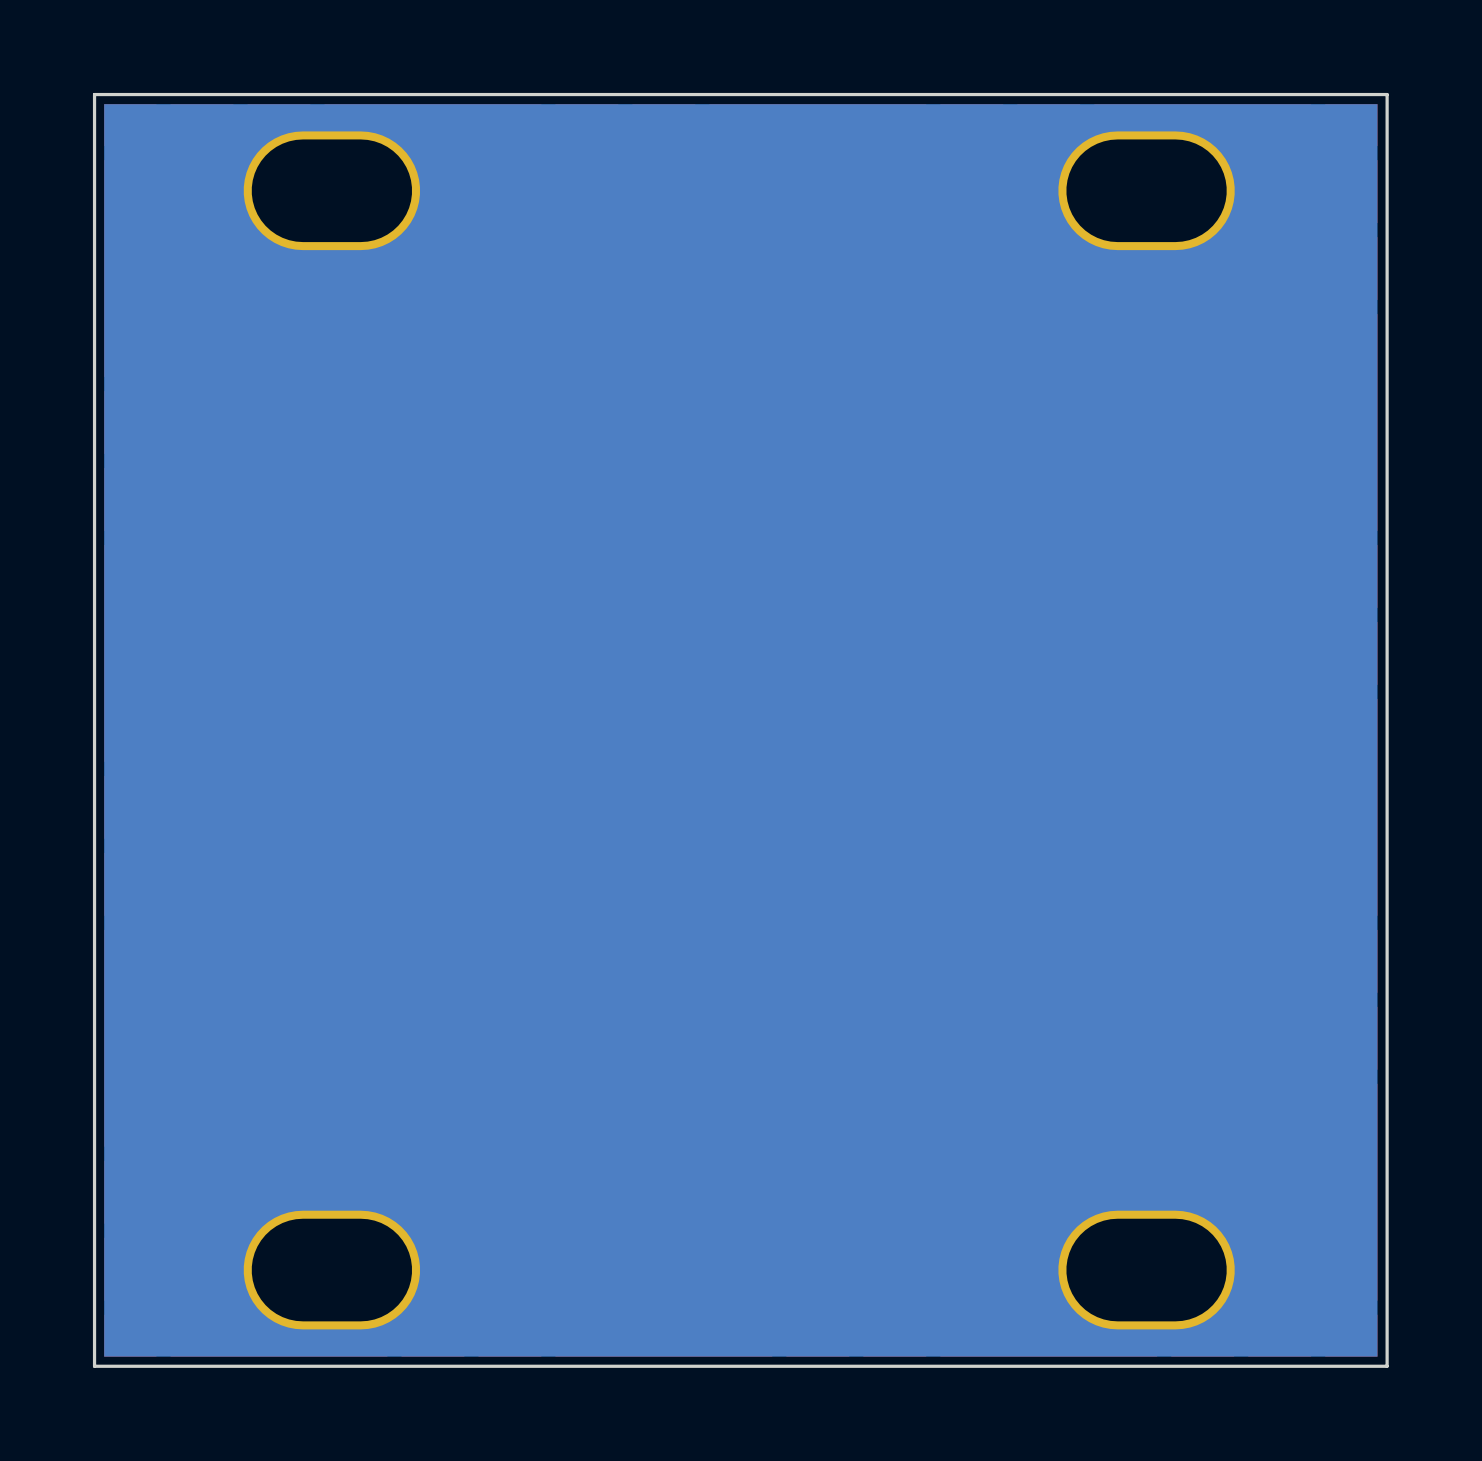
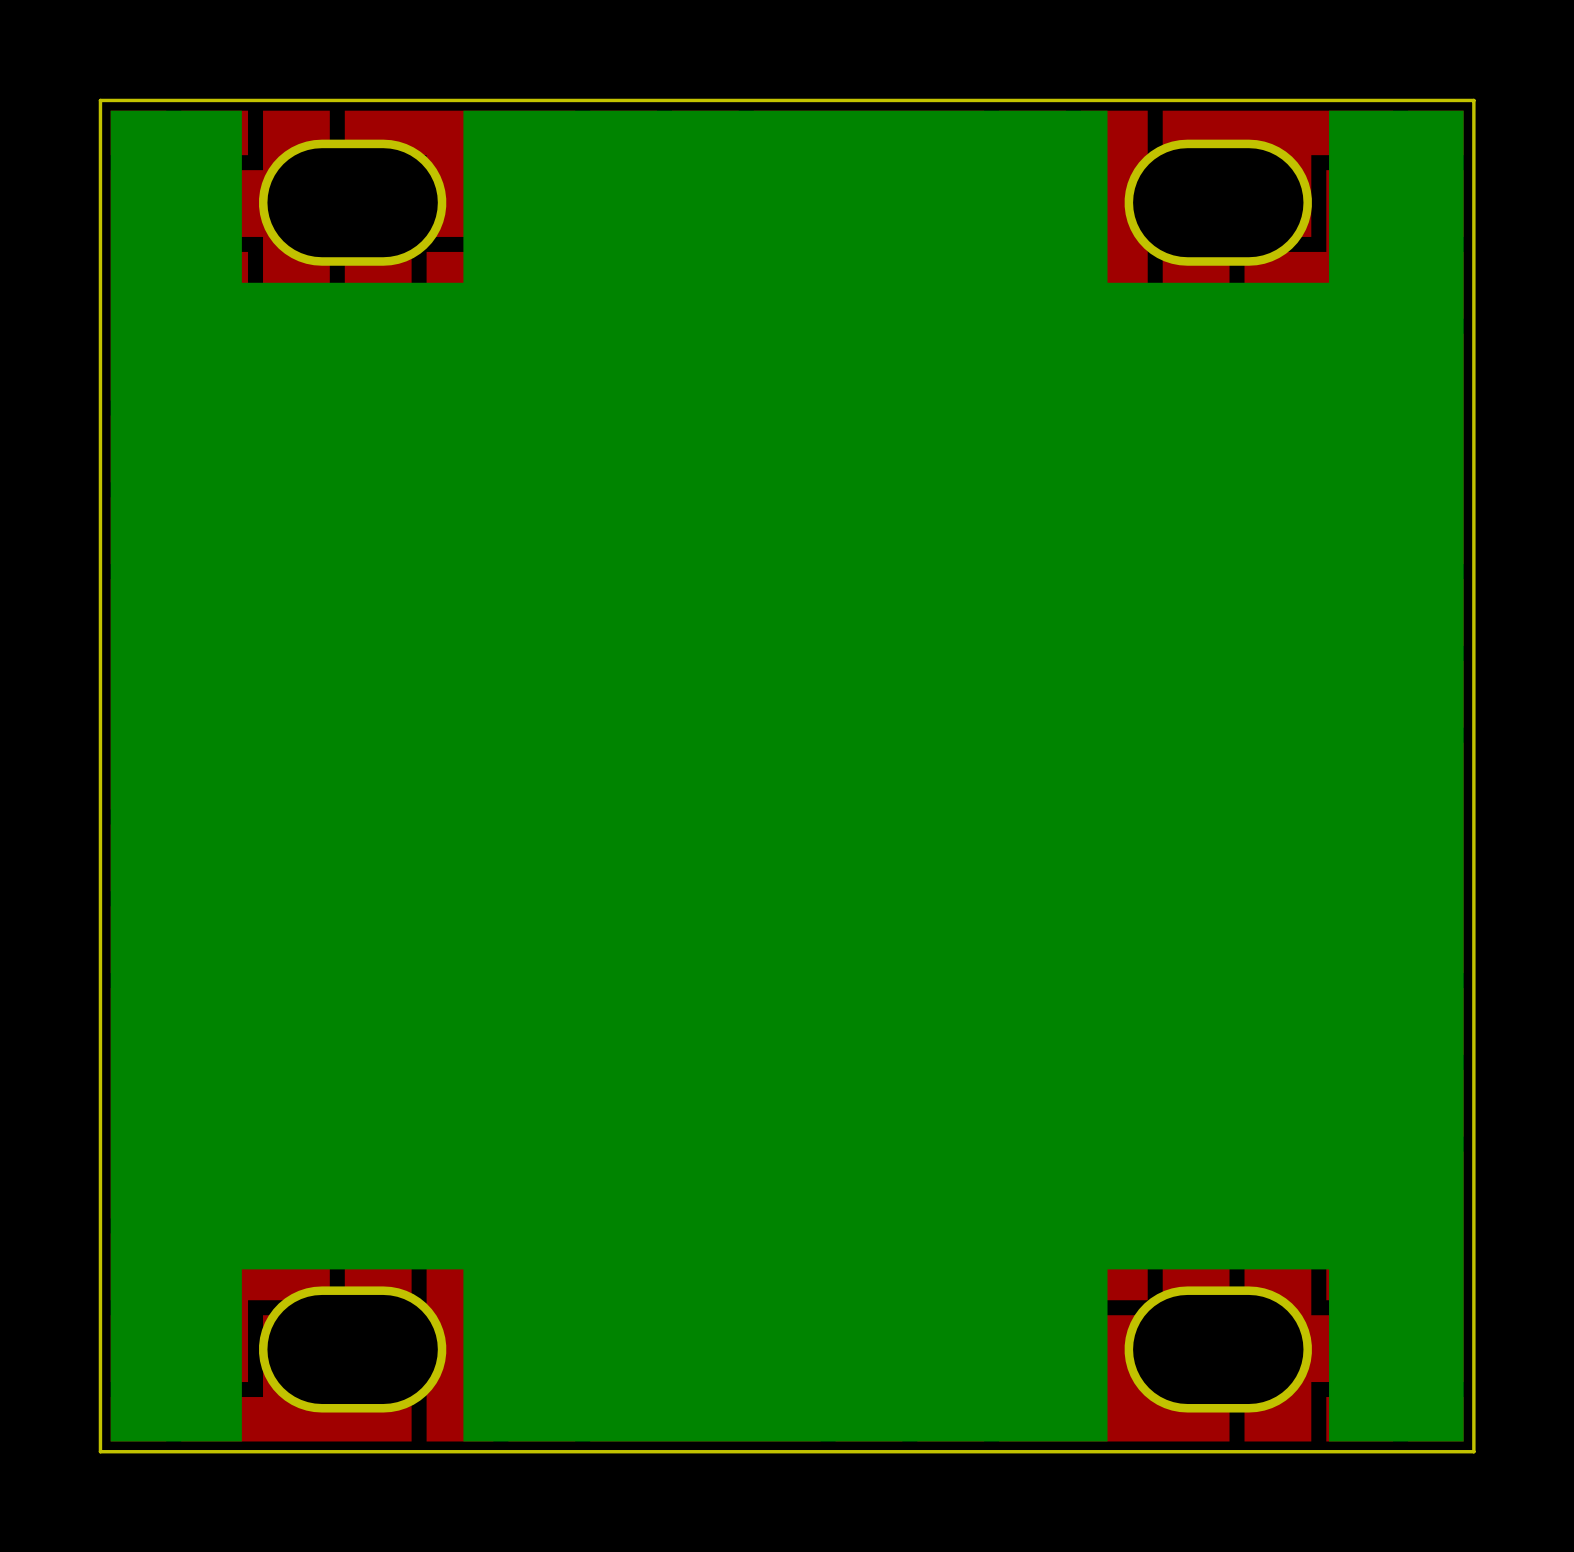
drawing shape: [104, 104, 1378, 1357] -> [241, 282, 1330, 1270]
drawing: none -> [110, 110, 242, 1442]
drawing: none -> [463, 110, 1108, 283]
drawing: none -> [1329, 110, 1464, 1442]
drawing: none -> [463, 1269, 1108, 1442]

